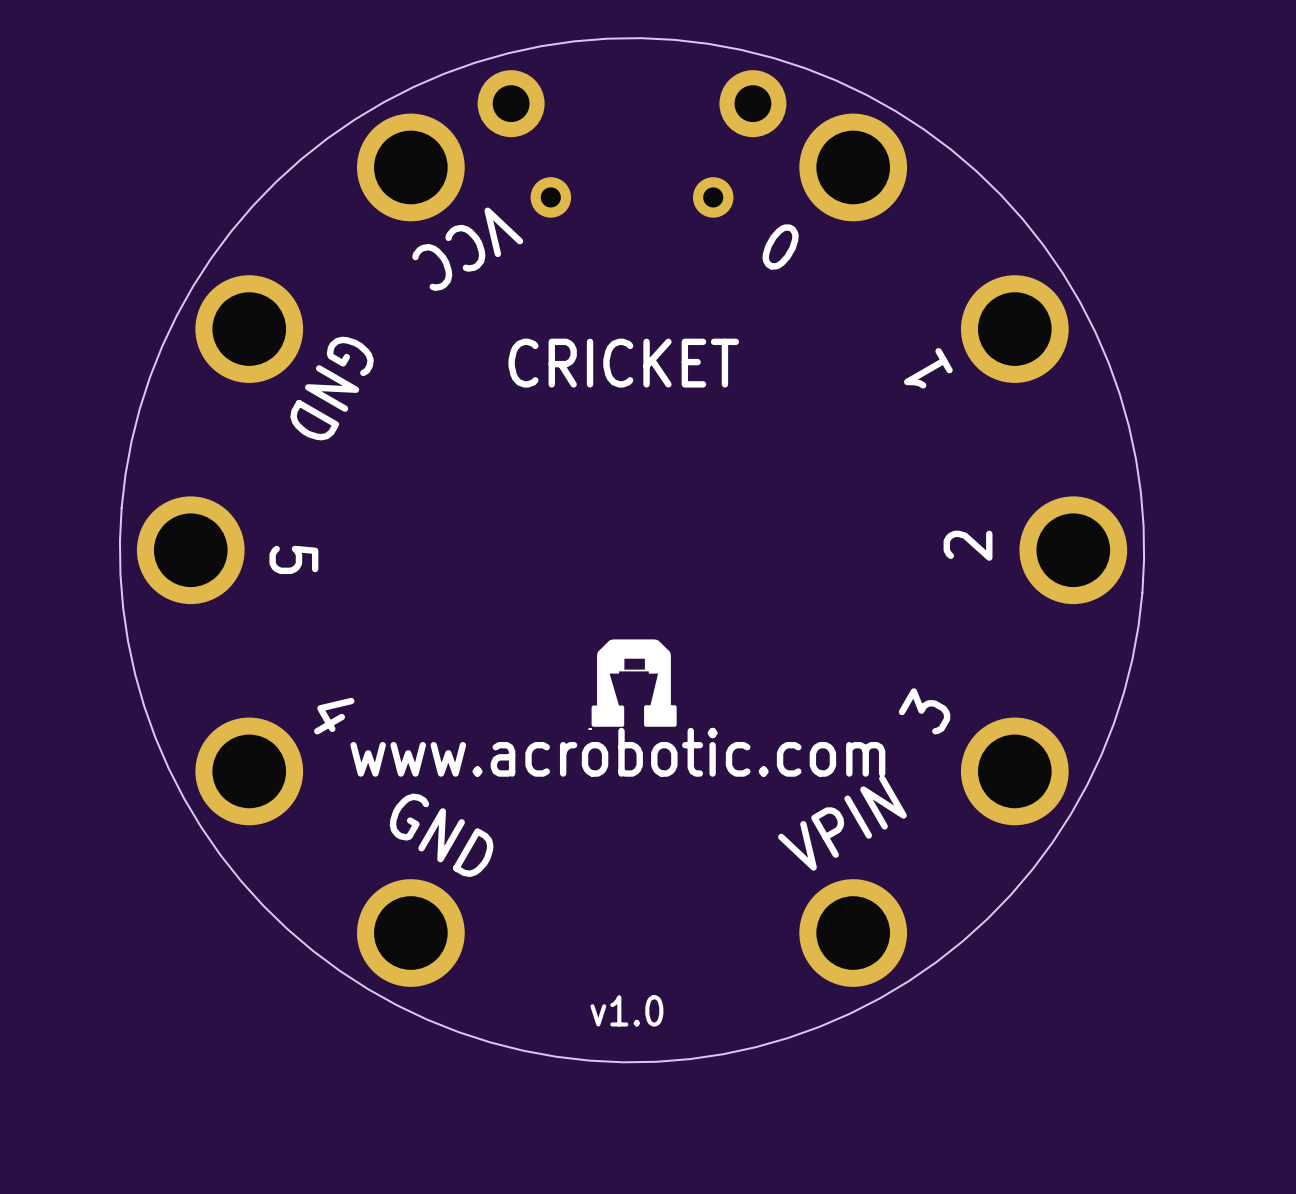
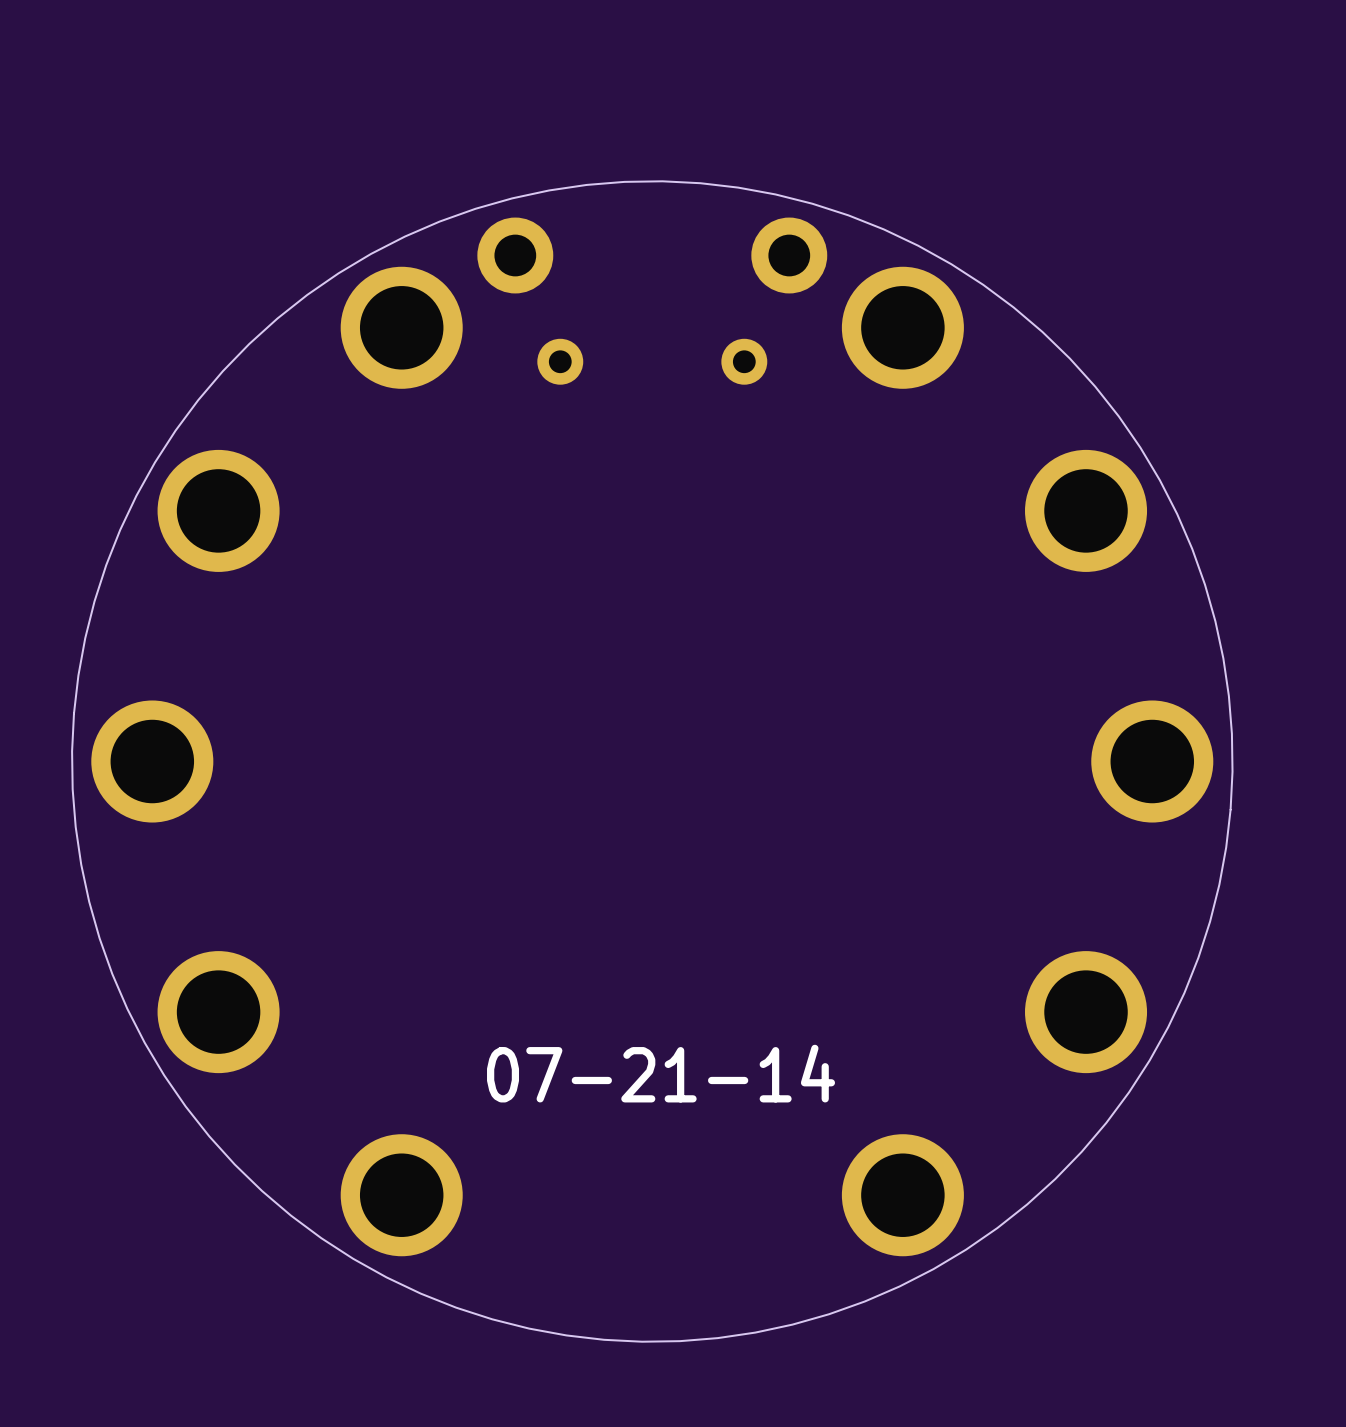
text: 0 (780, 246) -> none
text: VCC (467, 249) -> none
text: CRICKET (623, 363) -> none
text: 1 (928, 368) -> none
text: GND (332, 388) -> none
text: 2 (968, 545) -> none
text: 5 (293, 559) -> none
drawing: [591, 639, 677, 727] -> none
text: 3 (924, 711) -> none
text: 4 (334, 716) -> none
text: www.acrobotic.com (617, 752) -> none
text: VPIN (842, 823) -> none
text: none -> 07-21-14 (661, 1073)
text: GND (441, 835) -> none
text: v1.0 (626, 1010) -> none

